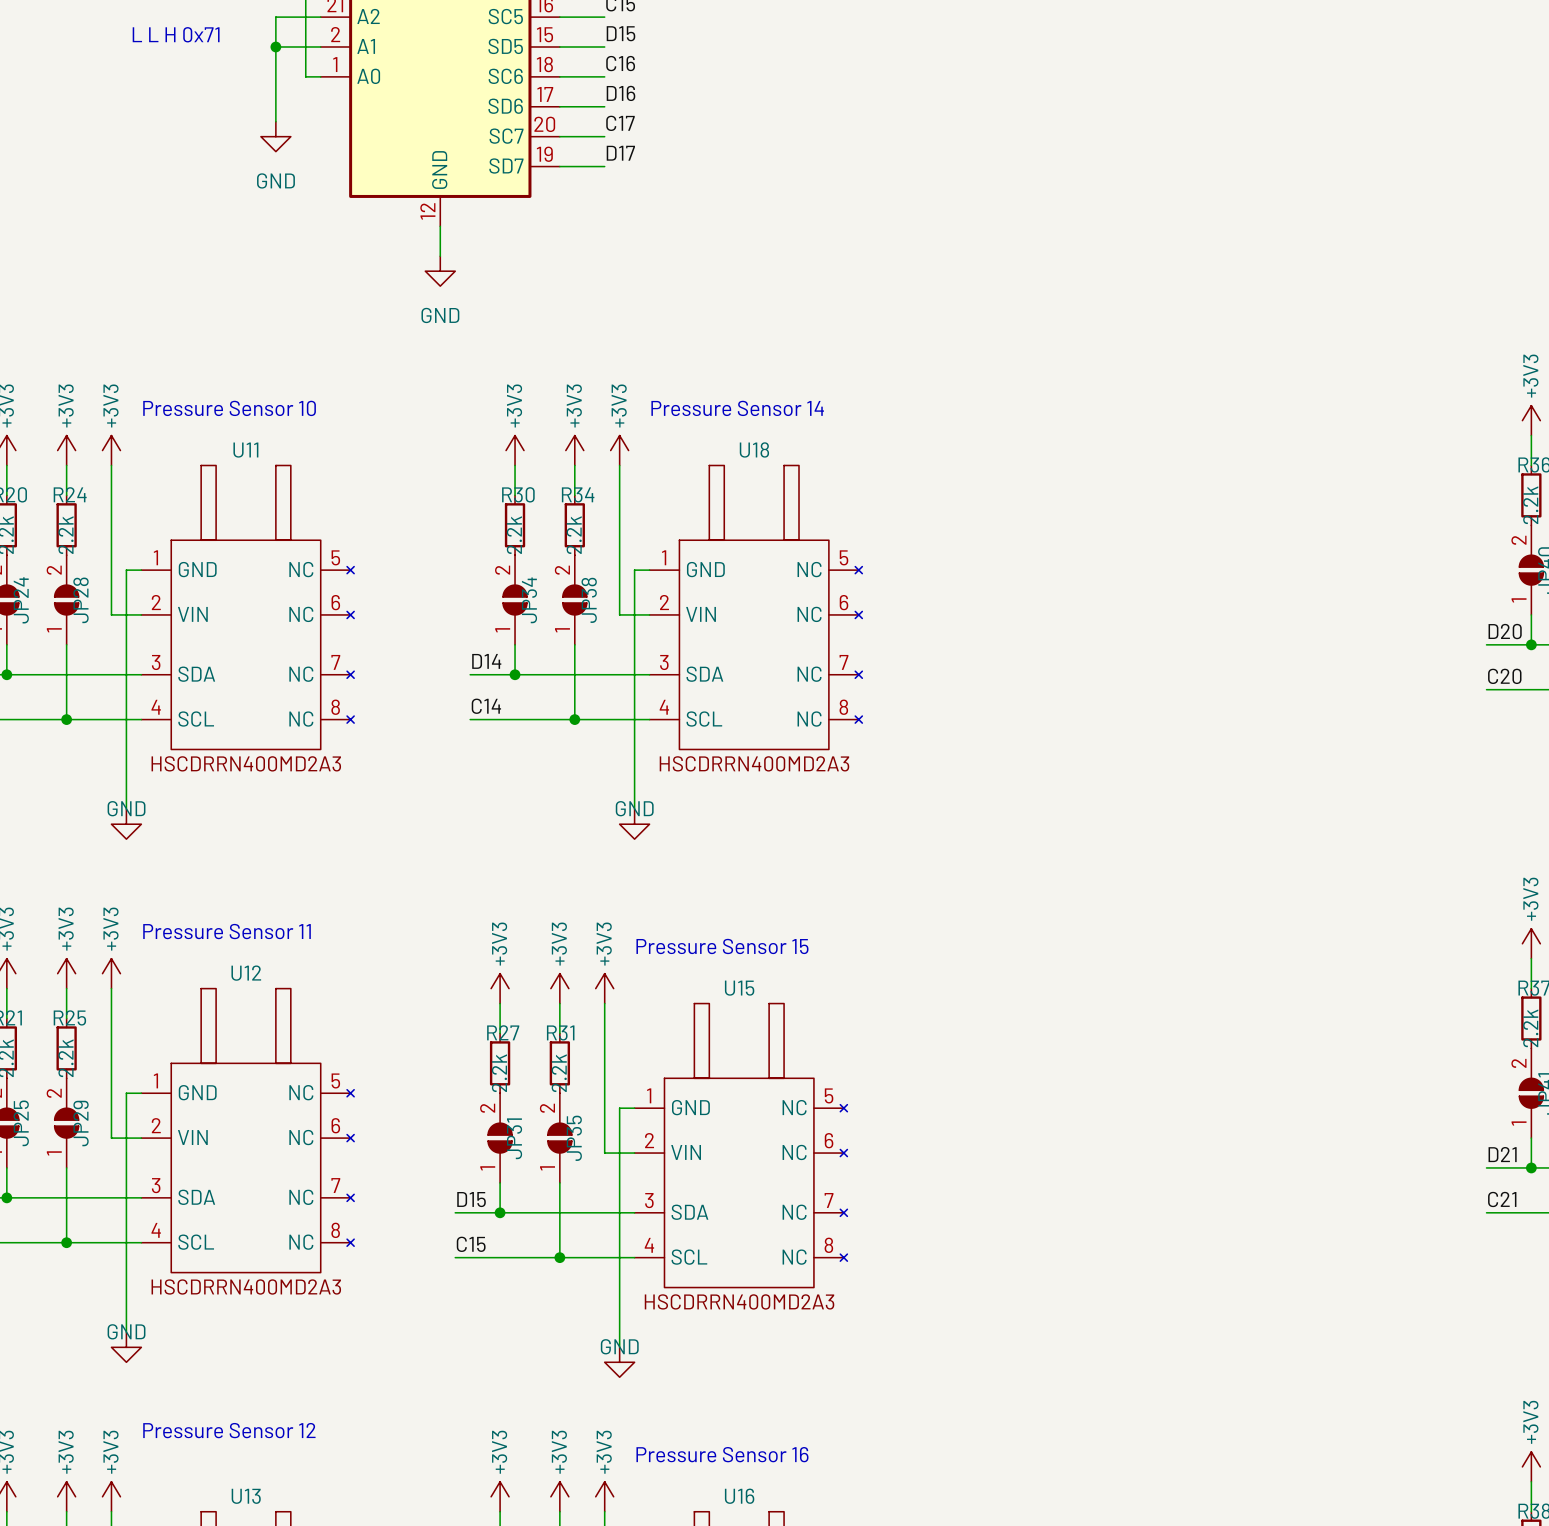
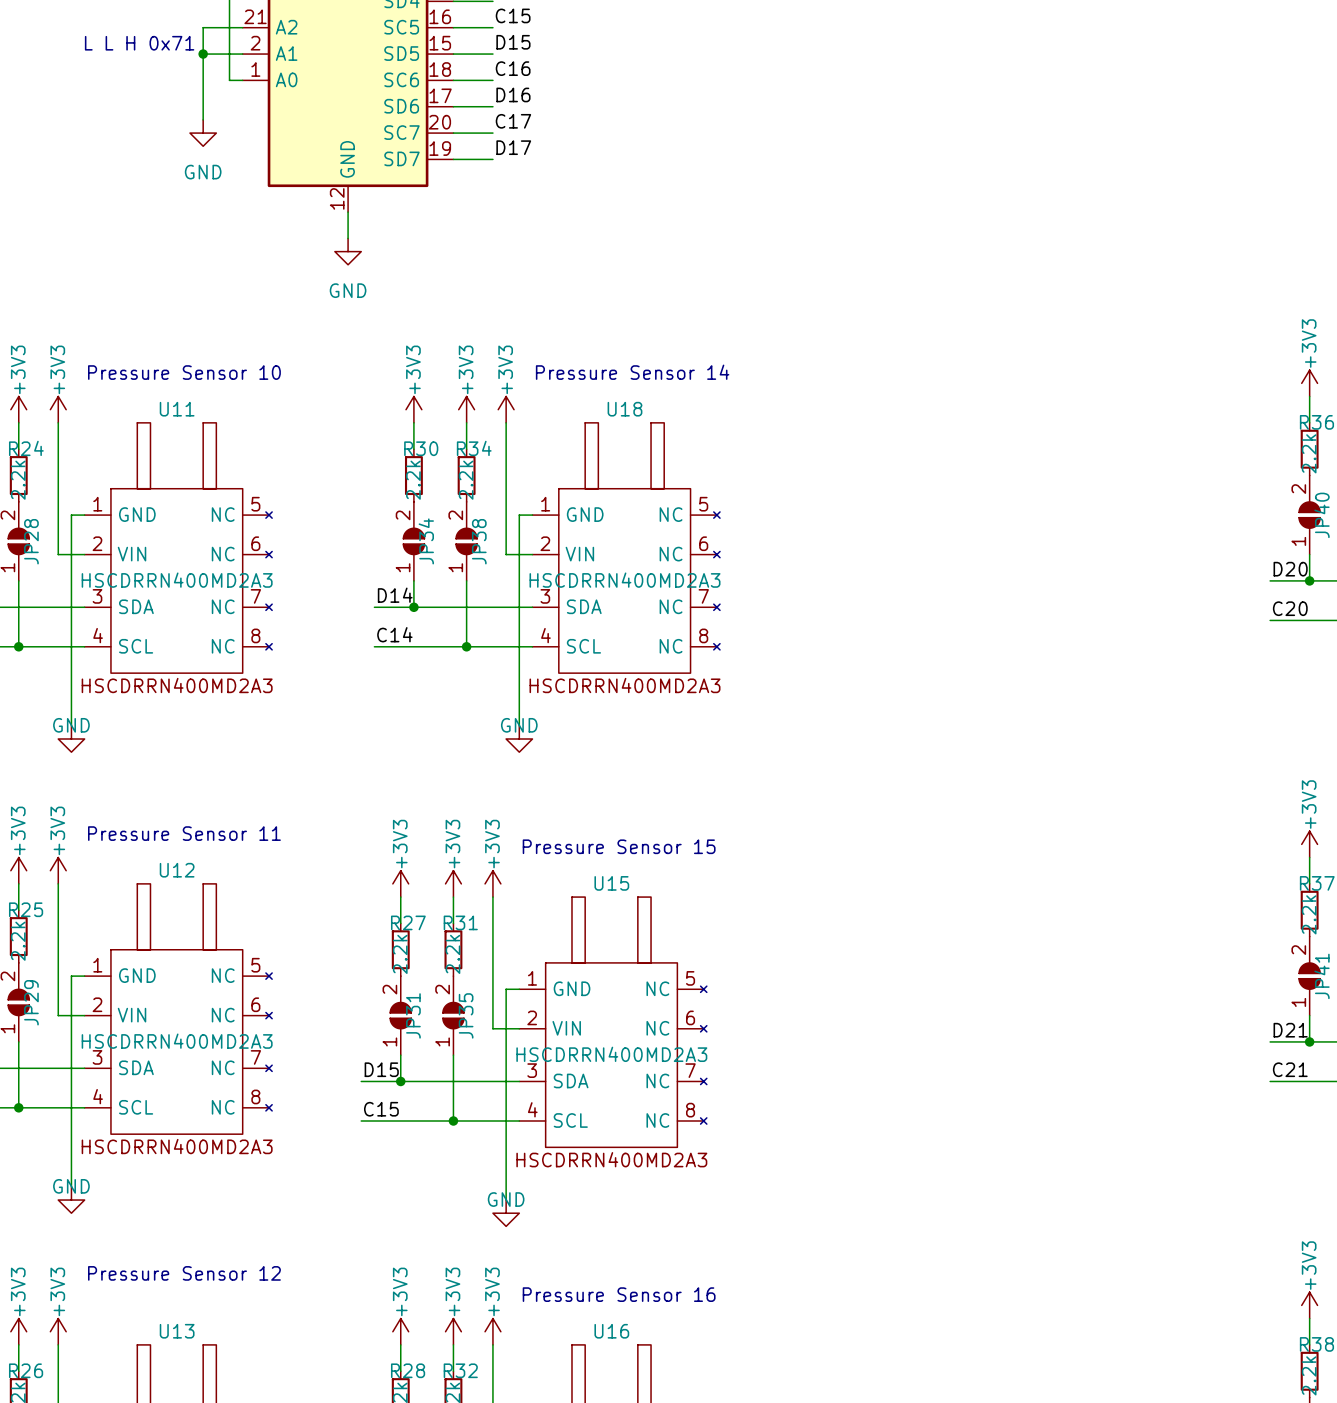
U11 value: none -> HSCDRRN400MD2A3 (177, 580)
U18 value: none -> HSCDRRN400MD2A3 (624, 580)
U12 value: none -> HSCDRRN400MD2A3 (177, 1041)
U15 value: none -> HSCDRRN400MD2A3 (611, 1054)

